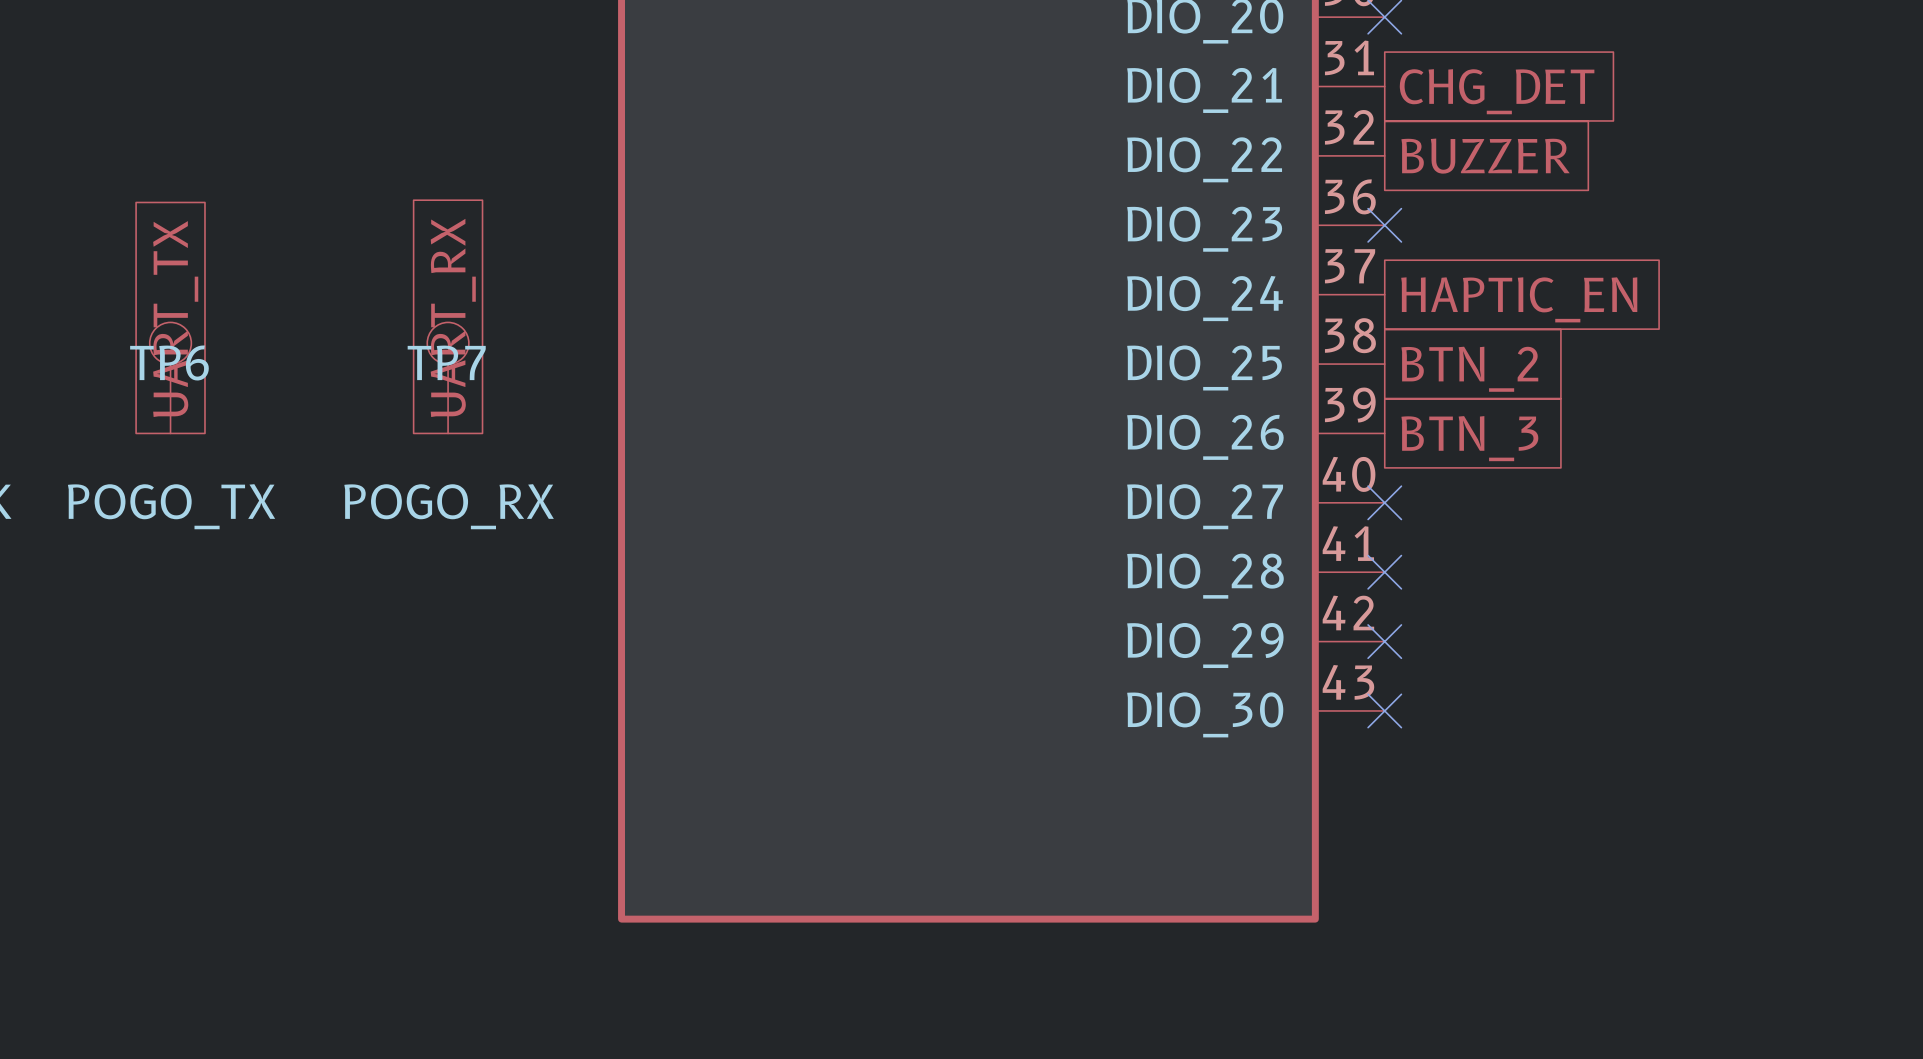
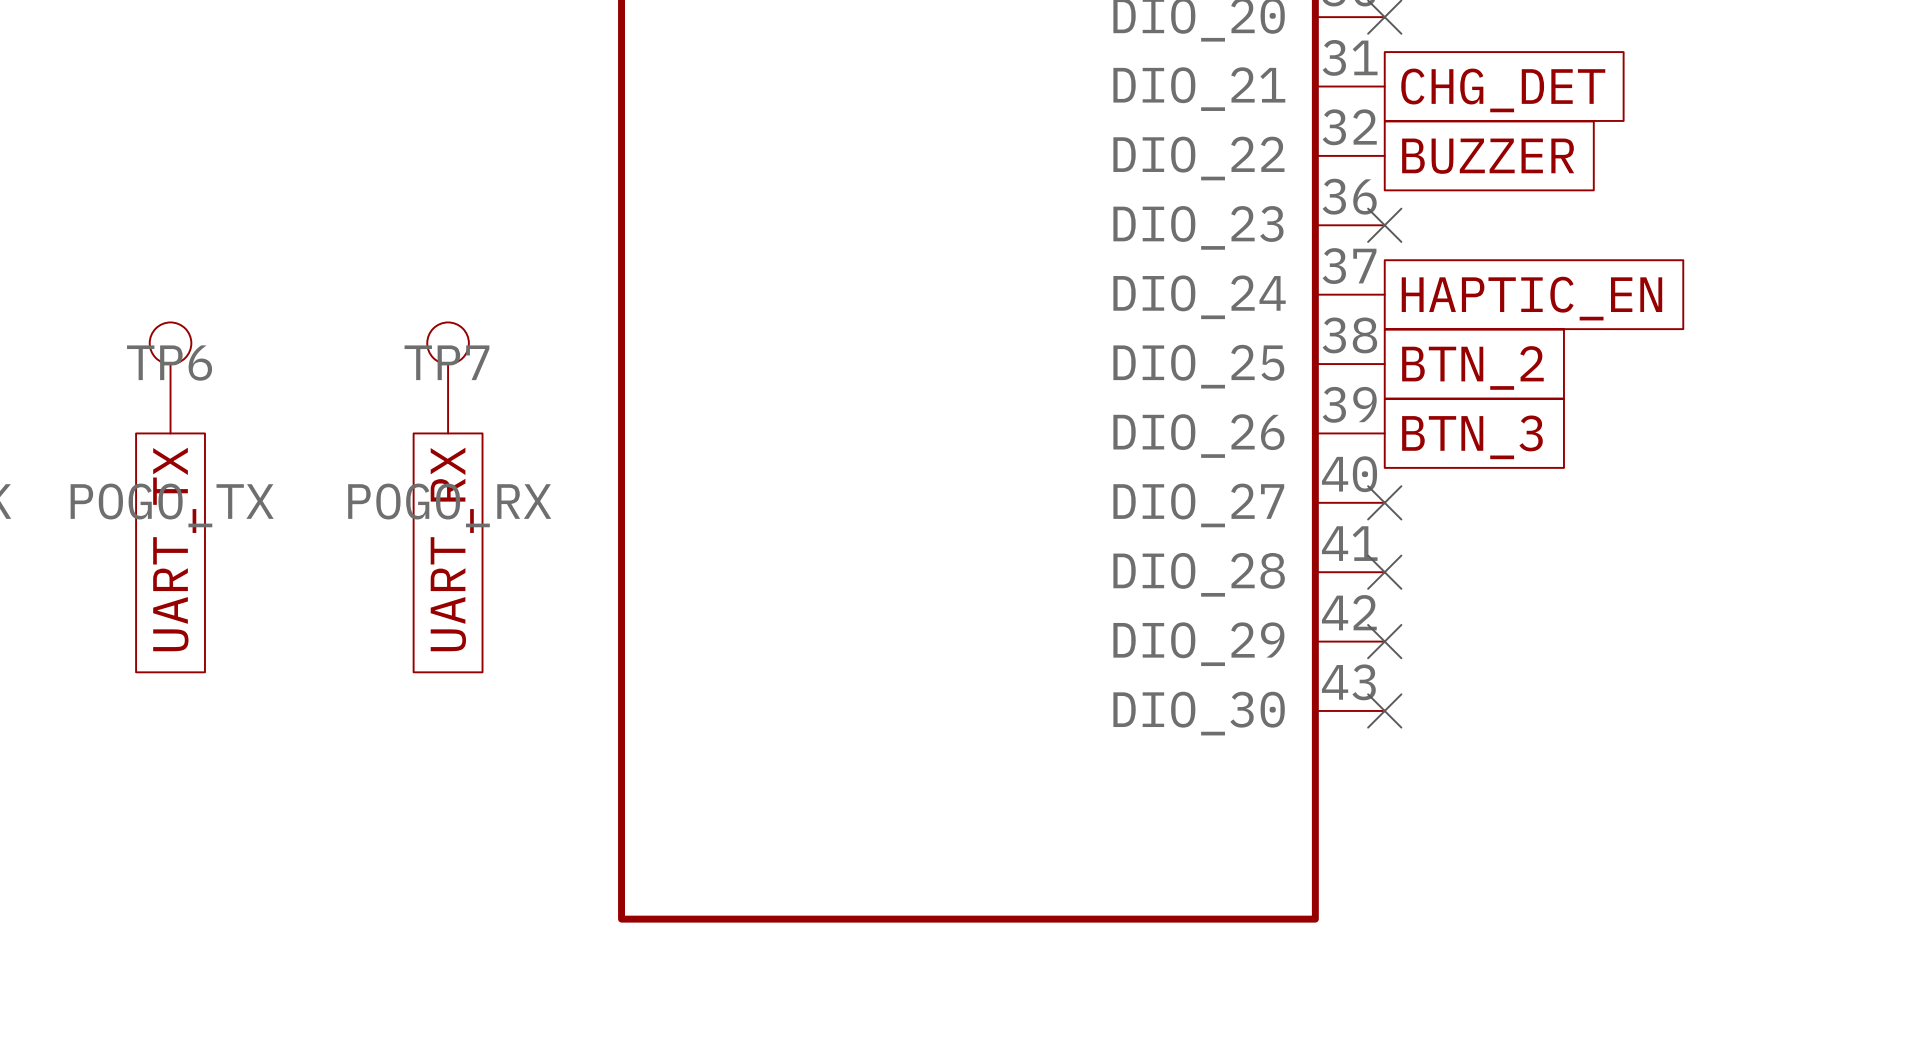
global label rotation: 0° (453, 317) -> 180° (452, 549)
global label position: UART_RX (453, 317) -> UART_RX (452, 549)
global label rotation: 0° (175, 319) -> 180° (174, 549)

